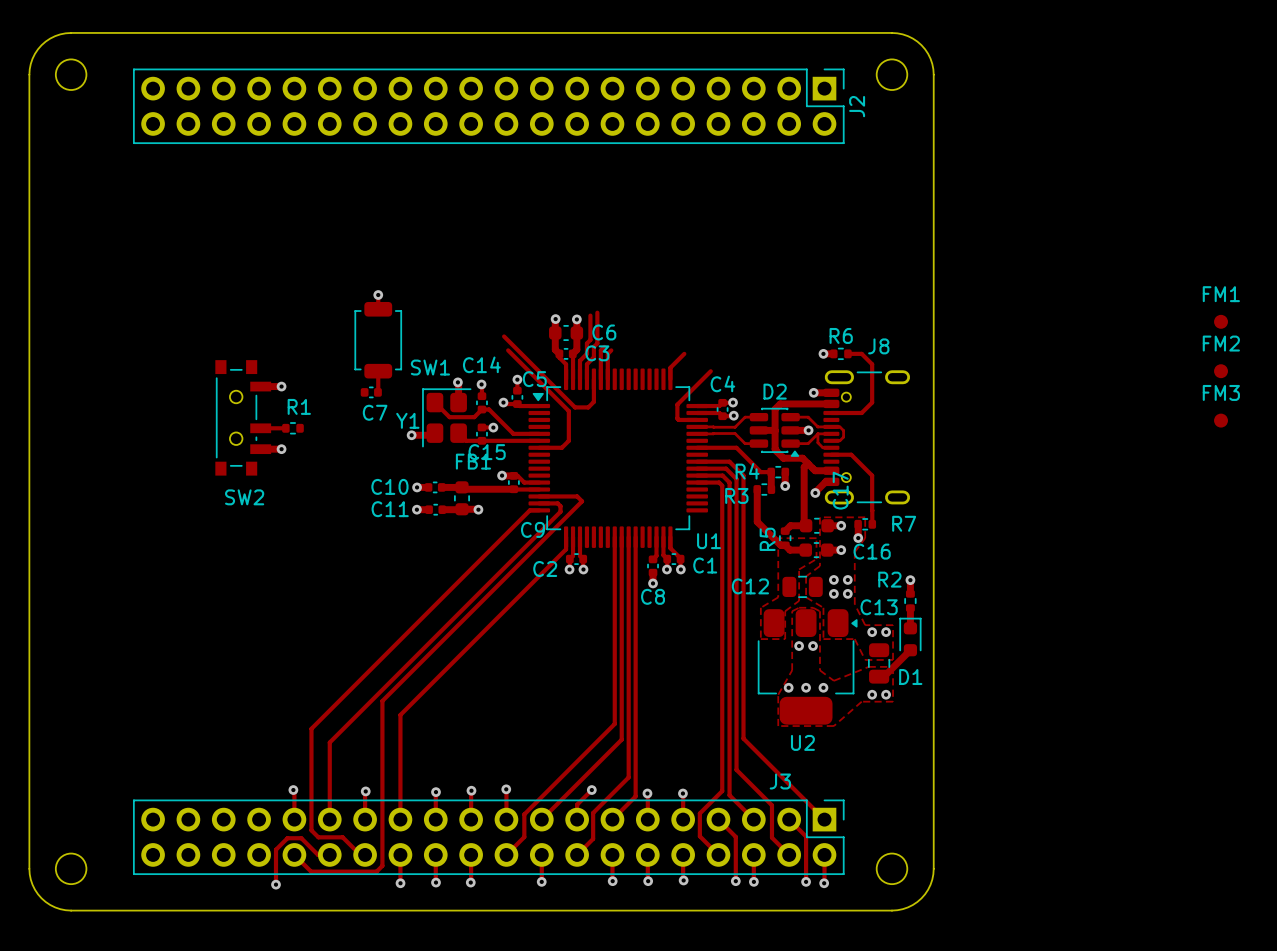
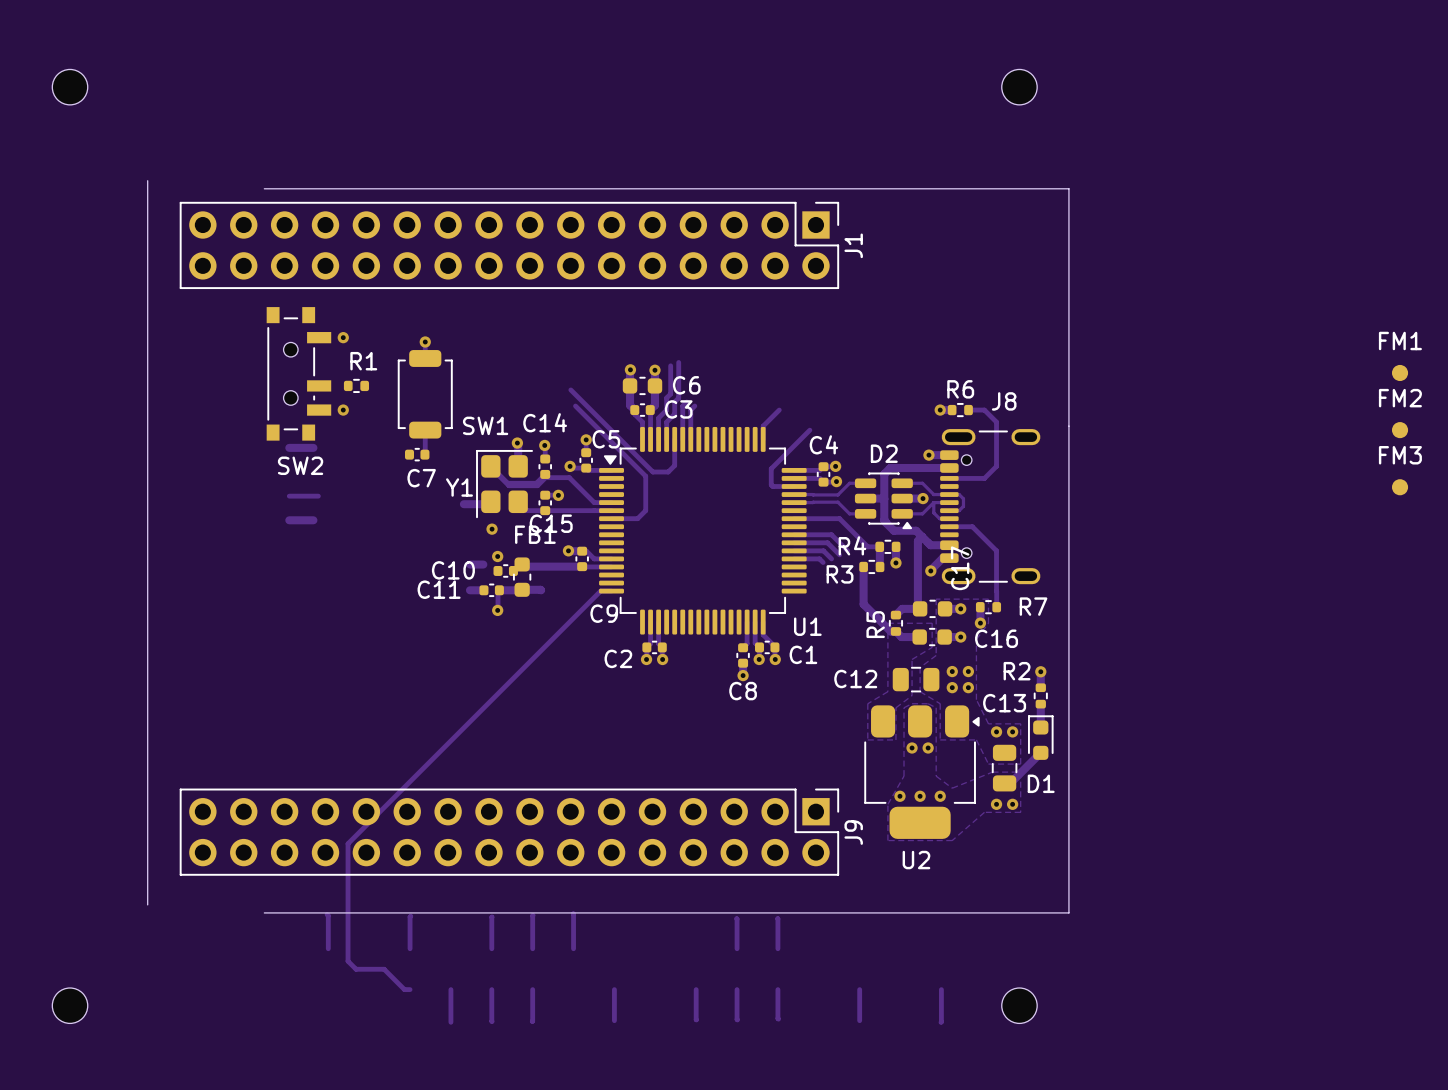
board edge: (71, 32) (891, 32) (907, 36) (921, 45) (930, 58) (933, 74) (933, 868) (930, 884) (921, 898) (907, 907) (891, 910) (71, 910) (55, 907) (41, 898) (32, 884) (29, 868) (29, 74) (32, 58) (41, 45) (55, 36) (71, 32) -> none
J2: (488, 106) -> none
board edge: none -> (147, 180) (147, 904)
board edge: none -> (264, 188) (1068, 188) (1068, 912) (264, 912)
J1: none -> (509, 245)
via: none -> (343, 337)
via position: (281, 386) -> (343, 410)
track: (481, 409) (489, 409) (513, 433) (524, 433) -> (492, 468) (508, 485) (537, 485) (546, 476) (569, 477) (594, 502)
SW2 position: (243, 417) -> (298, 373)
R1 position: (292, 428) -> (356, 385)
via: (411, 435) -> none
via: (281, 449) -> none
via: none -> (492, 529)
track: (743, 475) (743, 738) (824, 819) -> none
track: (736, 479) (736, 769) (771, 805) (771, 837) (789, 854) -> none
via: none -> (497, 556)
track: (729, 482) (729, 795) (753, 819) -> none
track: (722, 485) (722, 791) (699, 813) (699, 836) (718, 854) -> none
via: (417, 487) -> none
C10 position: (435, 487) -> (505, 570)
track: (441, 487) (462, 487) -> none
track: (539, 496) (577, 496) (582, 501) (382, 700) (382, 865) (376, 871) (311, 871) (294, 854) -> none
track: (539, 503) (557, 503) (560, 506) (560, 511) (329, 742) (329, 819) -> none
via: (416, 509) -> none
via: (478, 509) -> none
track: none -> (498, 595) (497, 610)
via: none -> (497, 610)
track: (566, 537) (566, 549) (400, 714) (400, 819) -> none
track: (614, 537) (614, 723) (524, 814) (524, 837) (506, 854) -> none
track: (621, 537) (621, 739) (541, 819) -> none
track: (628, 537) (628, 777) (593, 812) (593, 838) (577, 854) -> none
track: (635, 537) (635, 796) (612, 819) -> none
J9: none -> (509, 832)
via: (506, 789) -> none
via: (293, 790) -> none
via: (471, 790) -> none
track: (591, 790) (577, 804) (577, 819) -> none
via: (591, 790) -> none
via: (365, 791) -> none
via: (435, 792) -> none
via: (647, 793) -> none
via: (682, 793) -> none
track: (718, 819) (735, 836) (735, 881) -> none
track: (789, 819) (806, 836) (806, 881) -> none
J3: (488, 837) -> none
track: (329, 854) (318, 854) (301, 838) (287, 838) (275, 849) (275, 884) -> none
via: (683, 880) -> none
via: (541, 881) -> none
via: (612, 881) -> none
via: (648, 881) -> none
via: (735, 881) -> none
via: (753, 881) -> none
via: (806, 881) -> none
via: (435, 882) -> none
via: (470, 882) -> none
via: (400, 883) -> none
via: (824, 883) -> none
via: (275, 884) -> none

